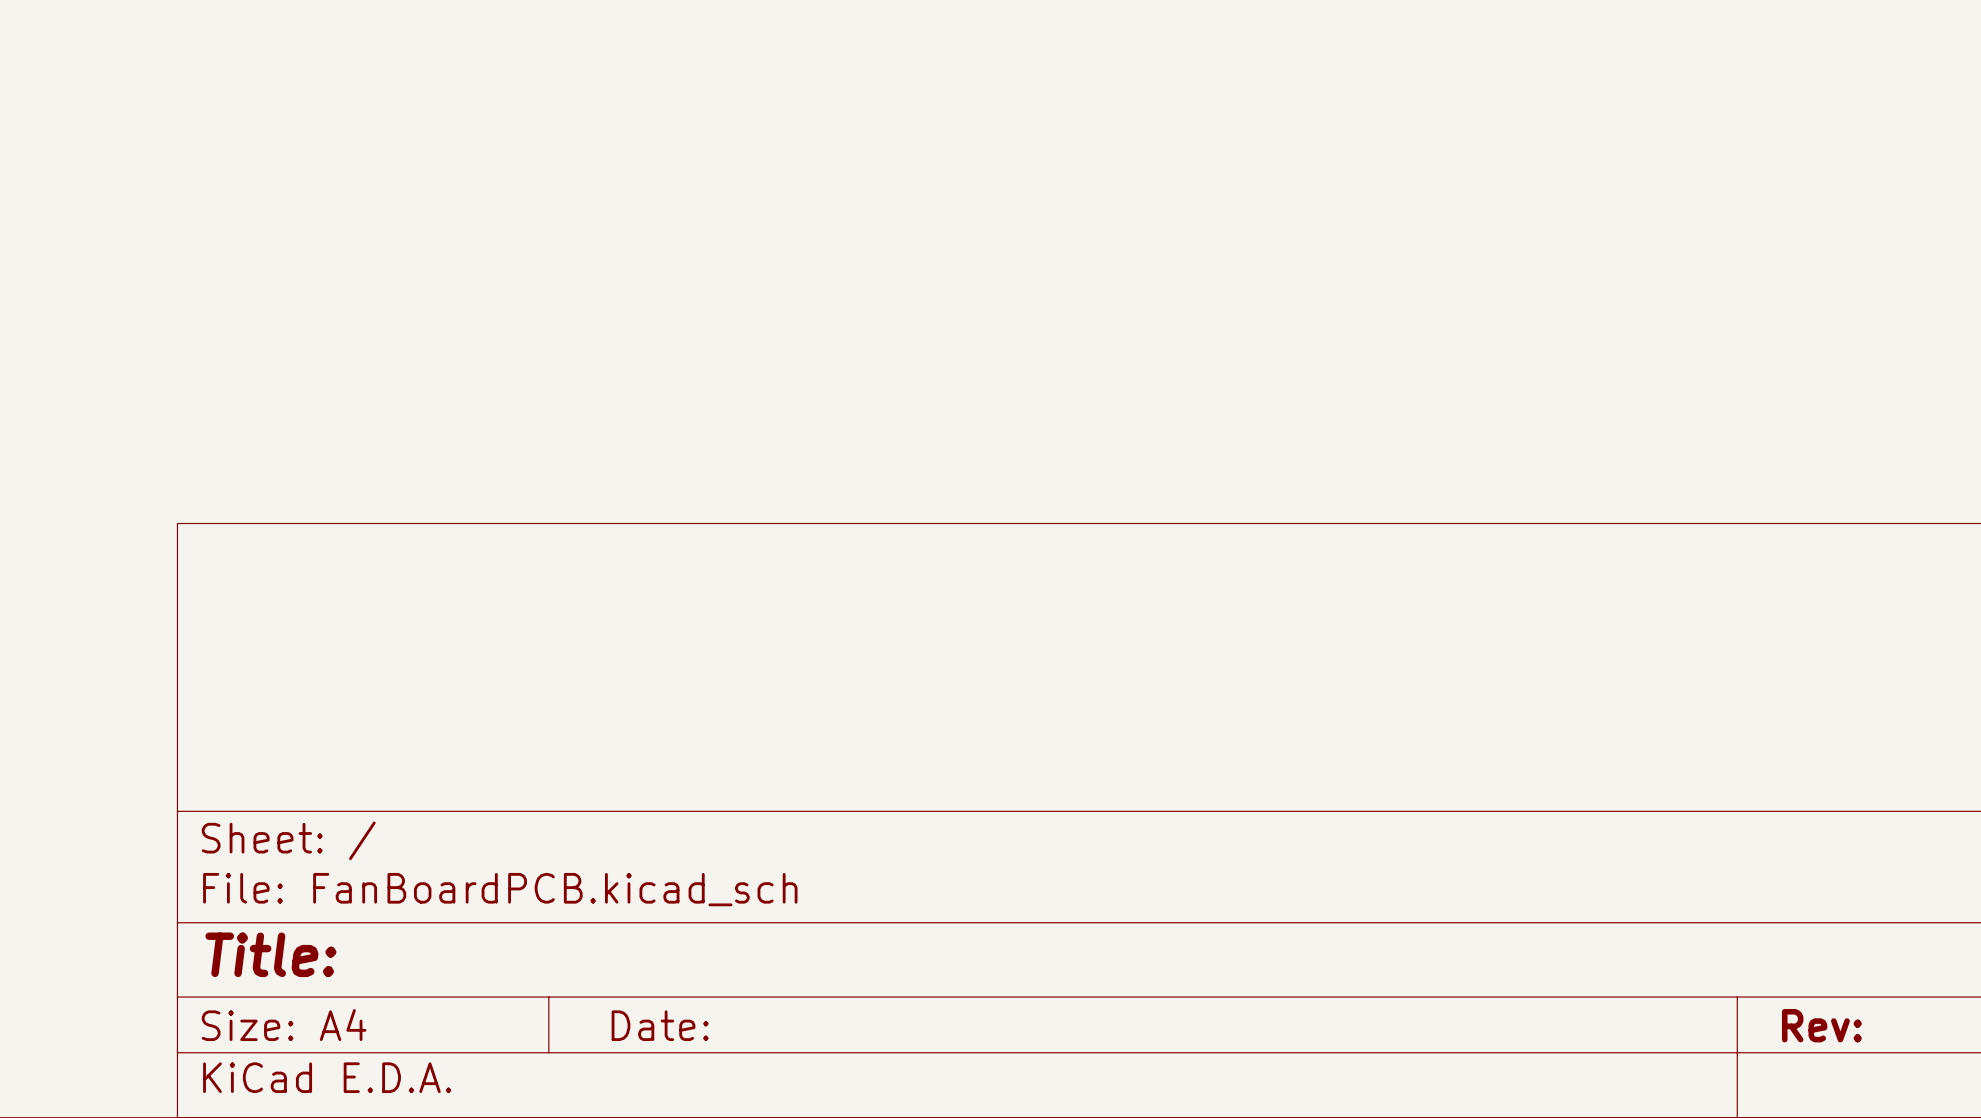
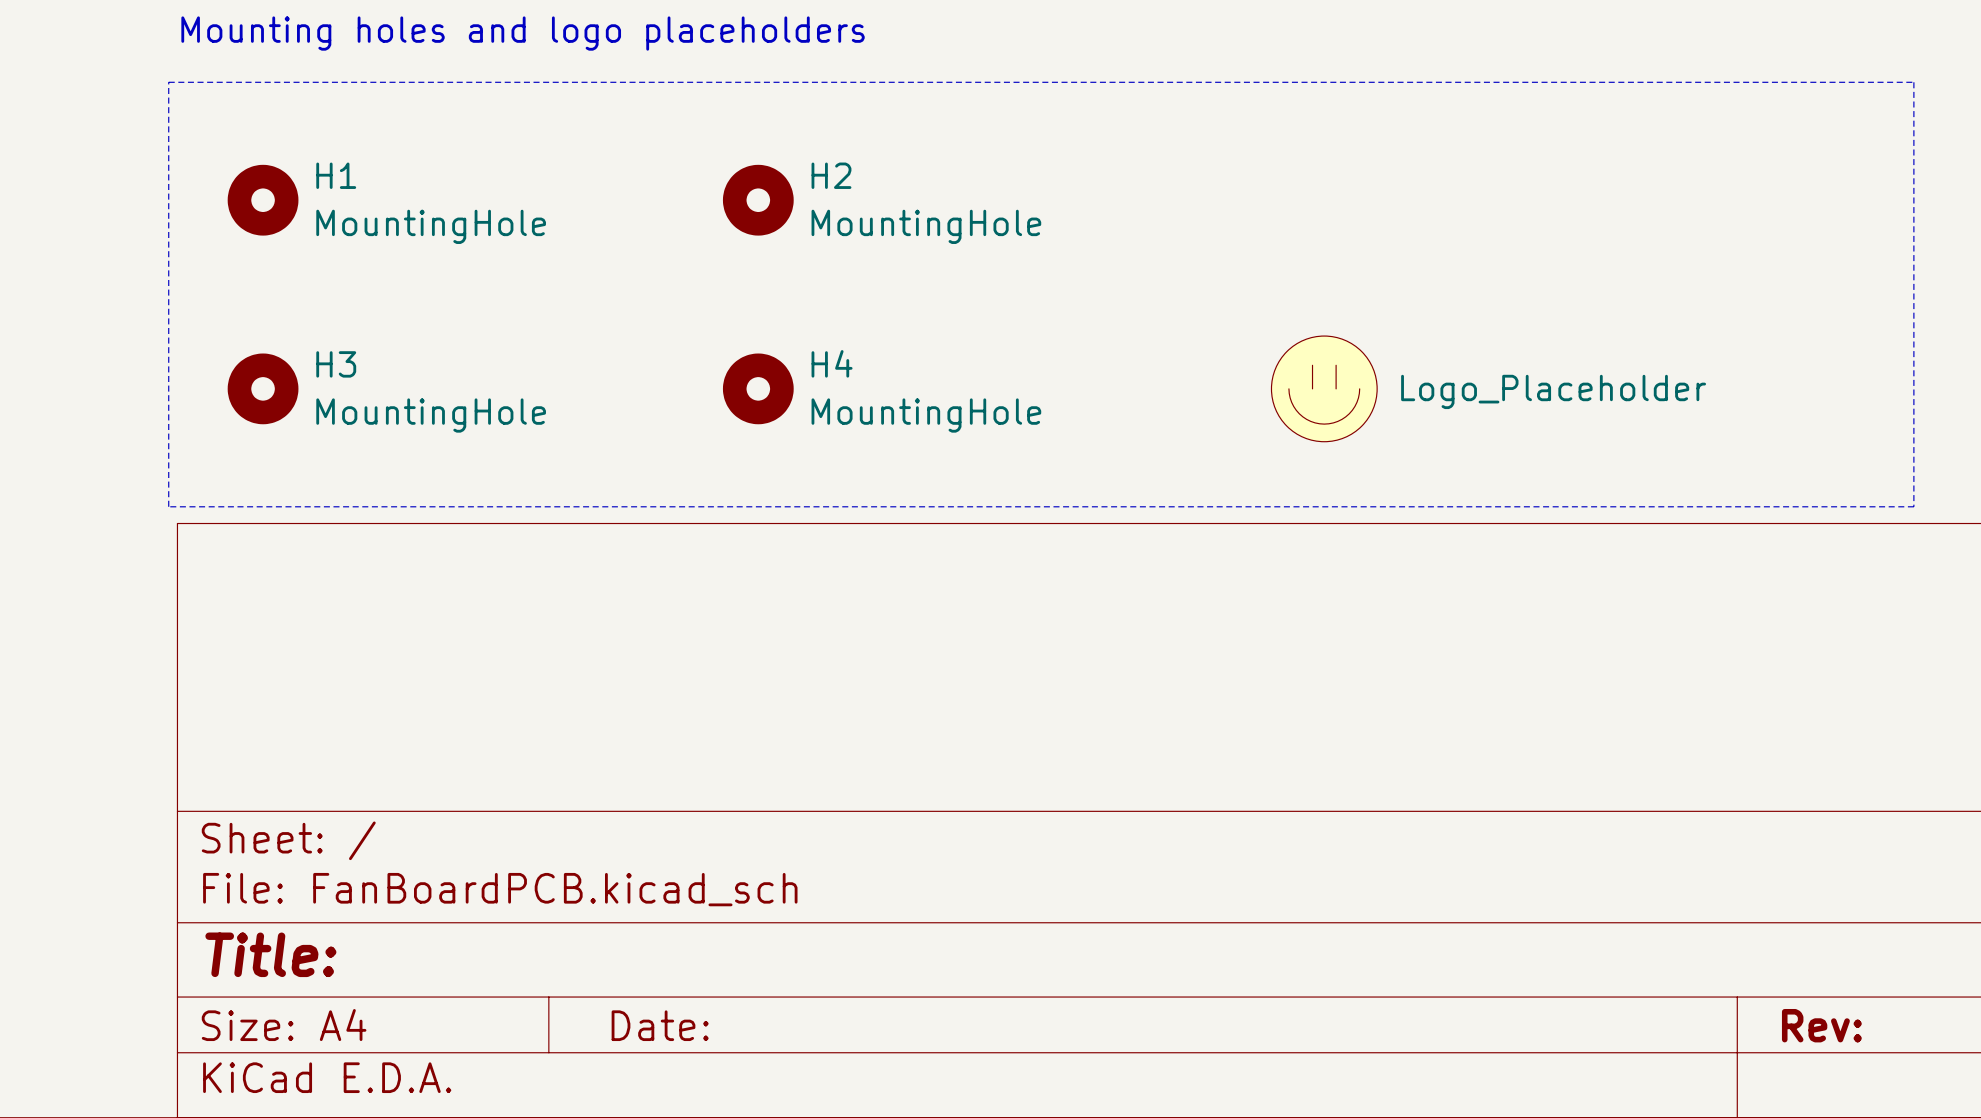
text: none -> Mounting holes and logo placeholders (523, 33)
line: none -> (168, 82) (1913, 82) (1913, 506) (168, 506) (168, 82)
H1: none -> MountingHole (263, 200)
H2: none -> MountingHole (758, 200)
H3: none -> MountingHole (263, 388)
H4: none -> MountingHole (758, 388)
part: none -> Logo_Placeholder (1324, 388)

